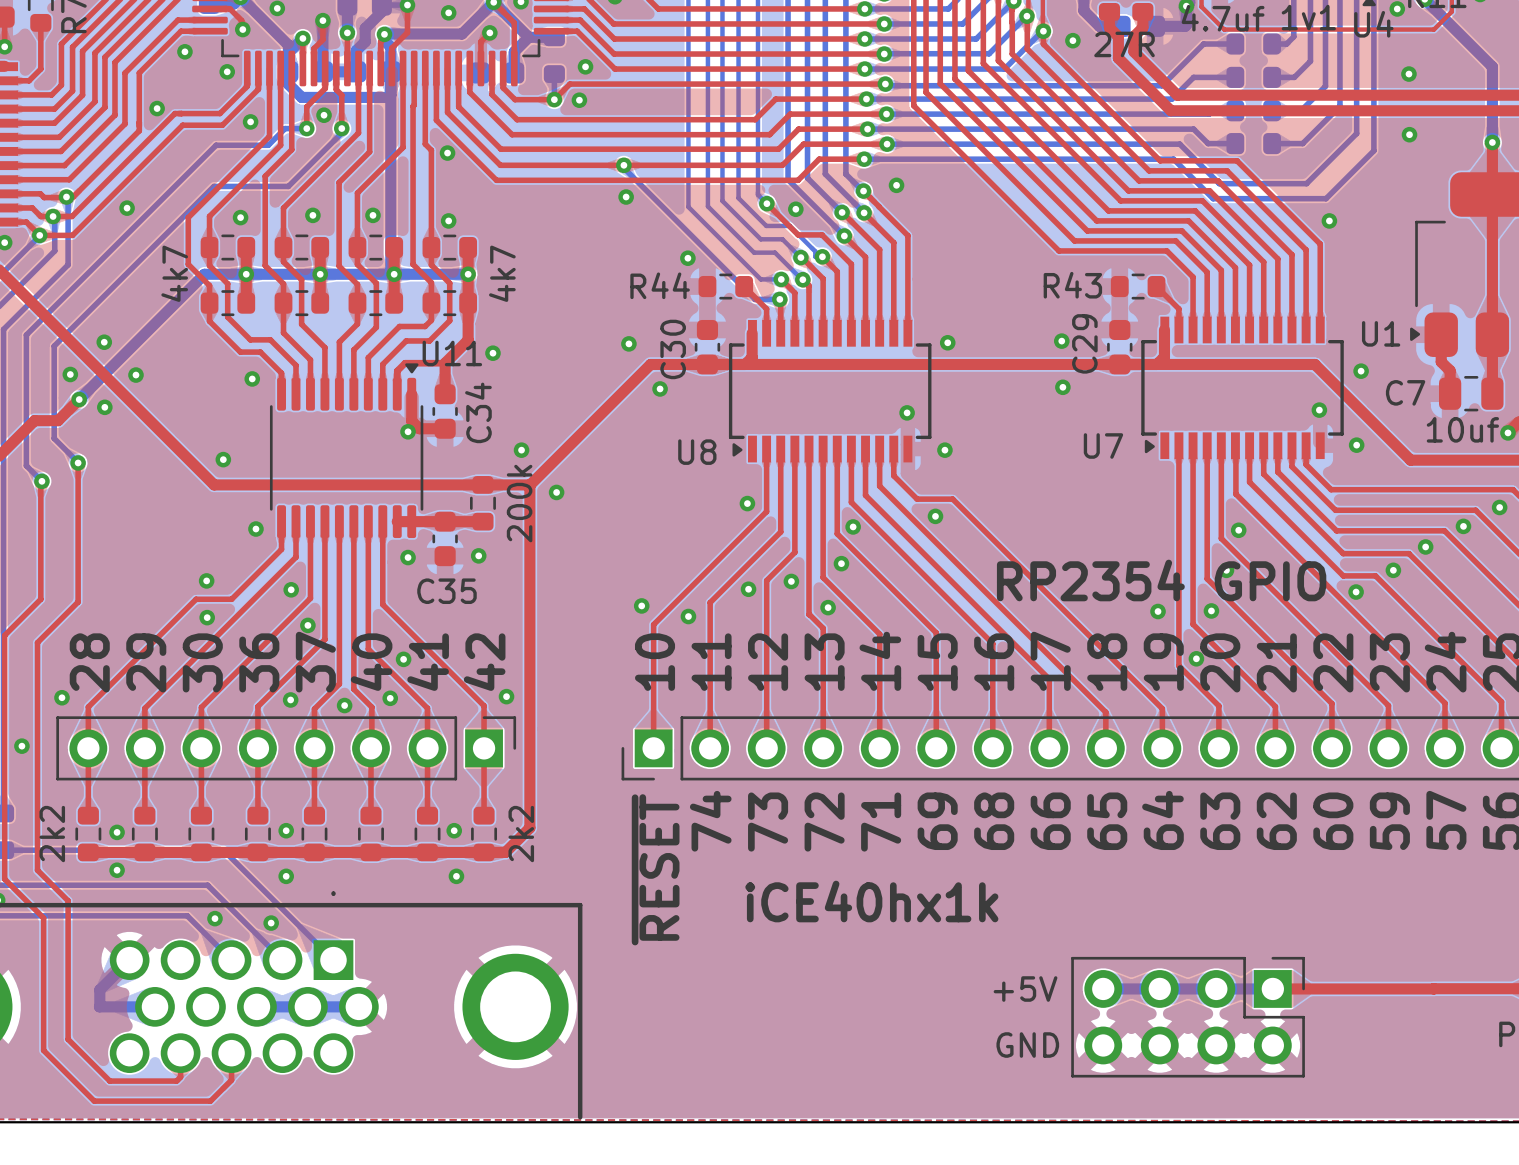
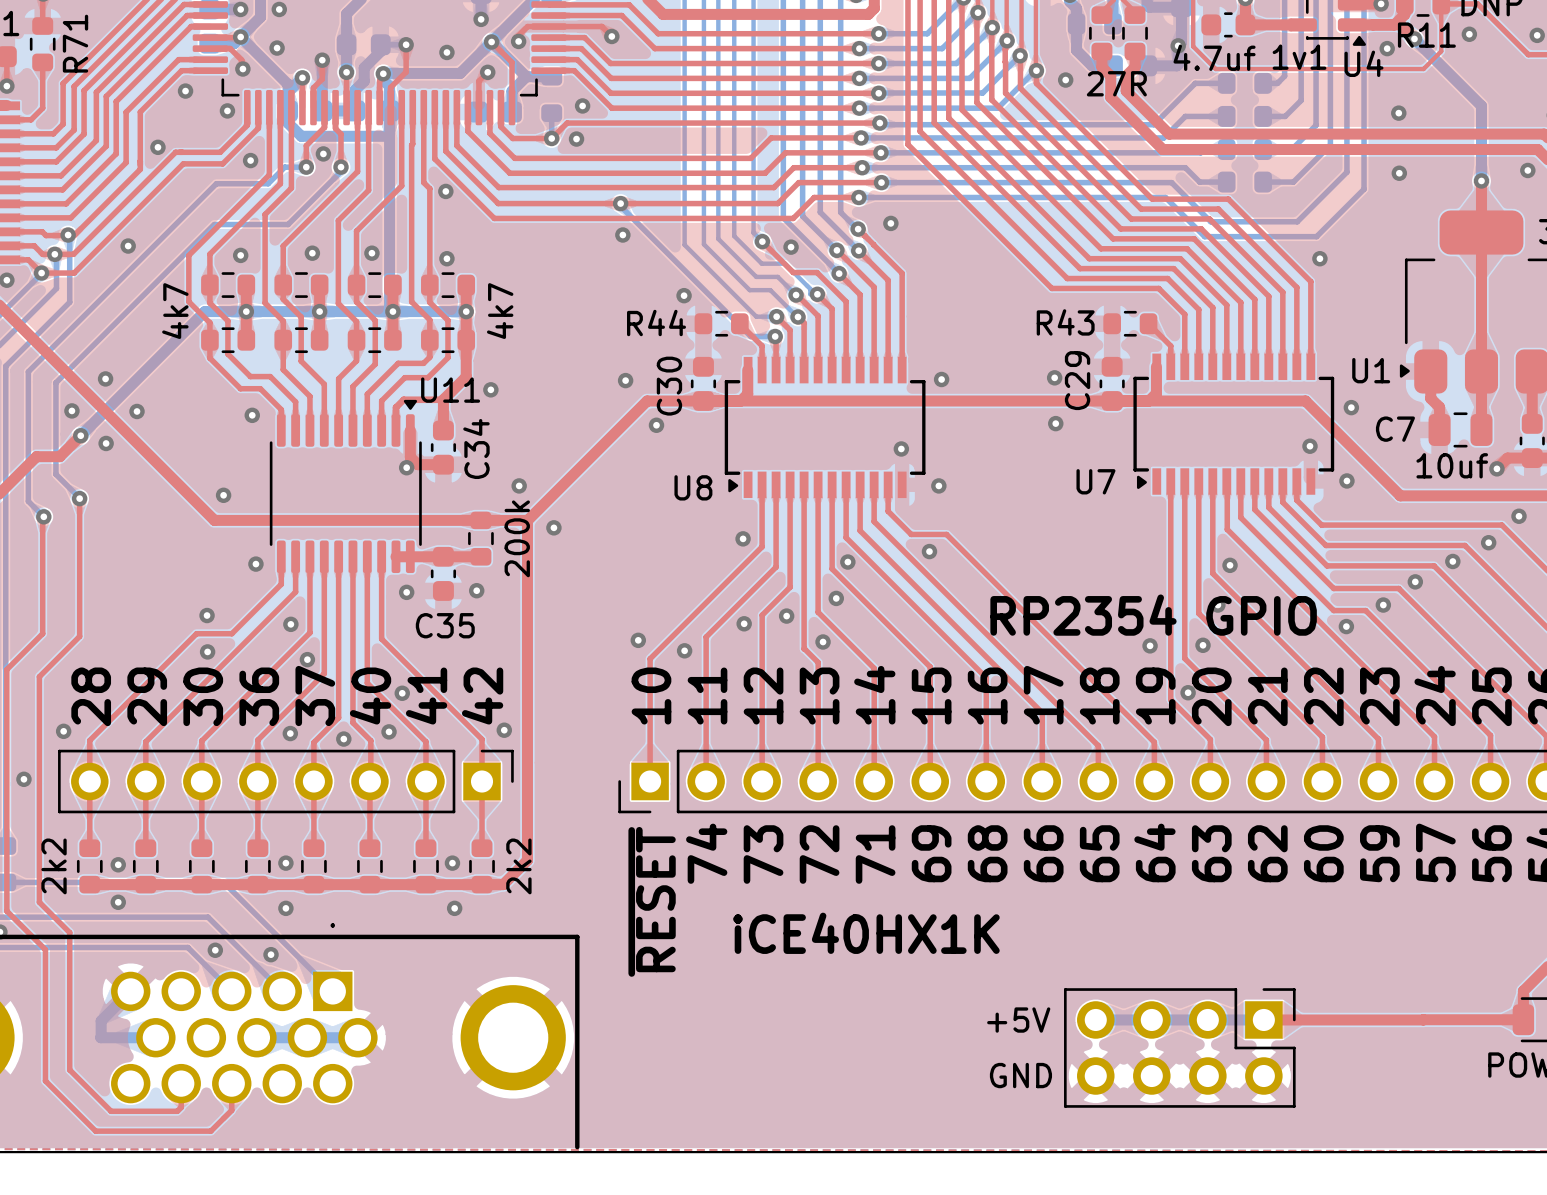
text: iCE40hx1k (871, 901) -> iCE40HX1K (866, 933)

